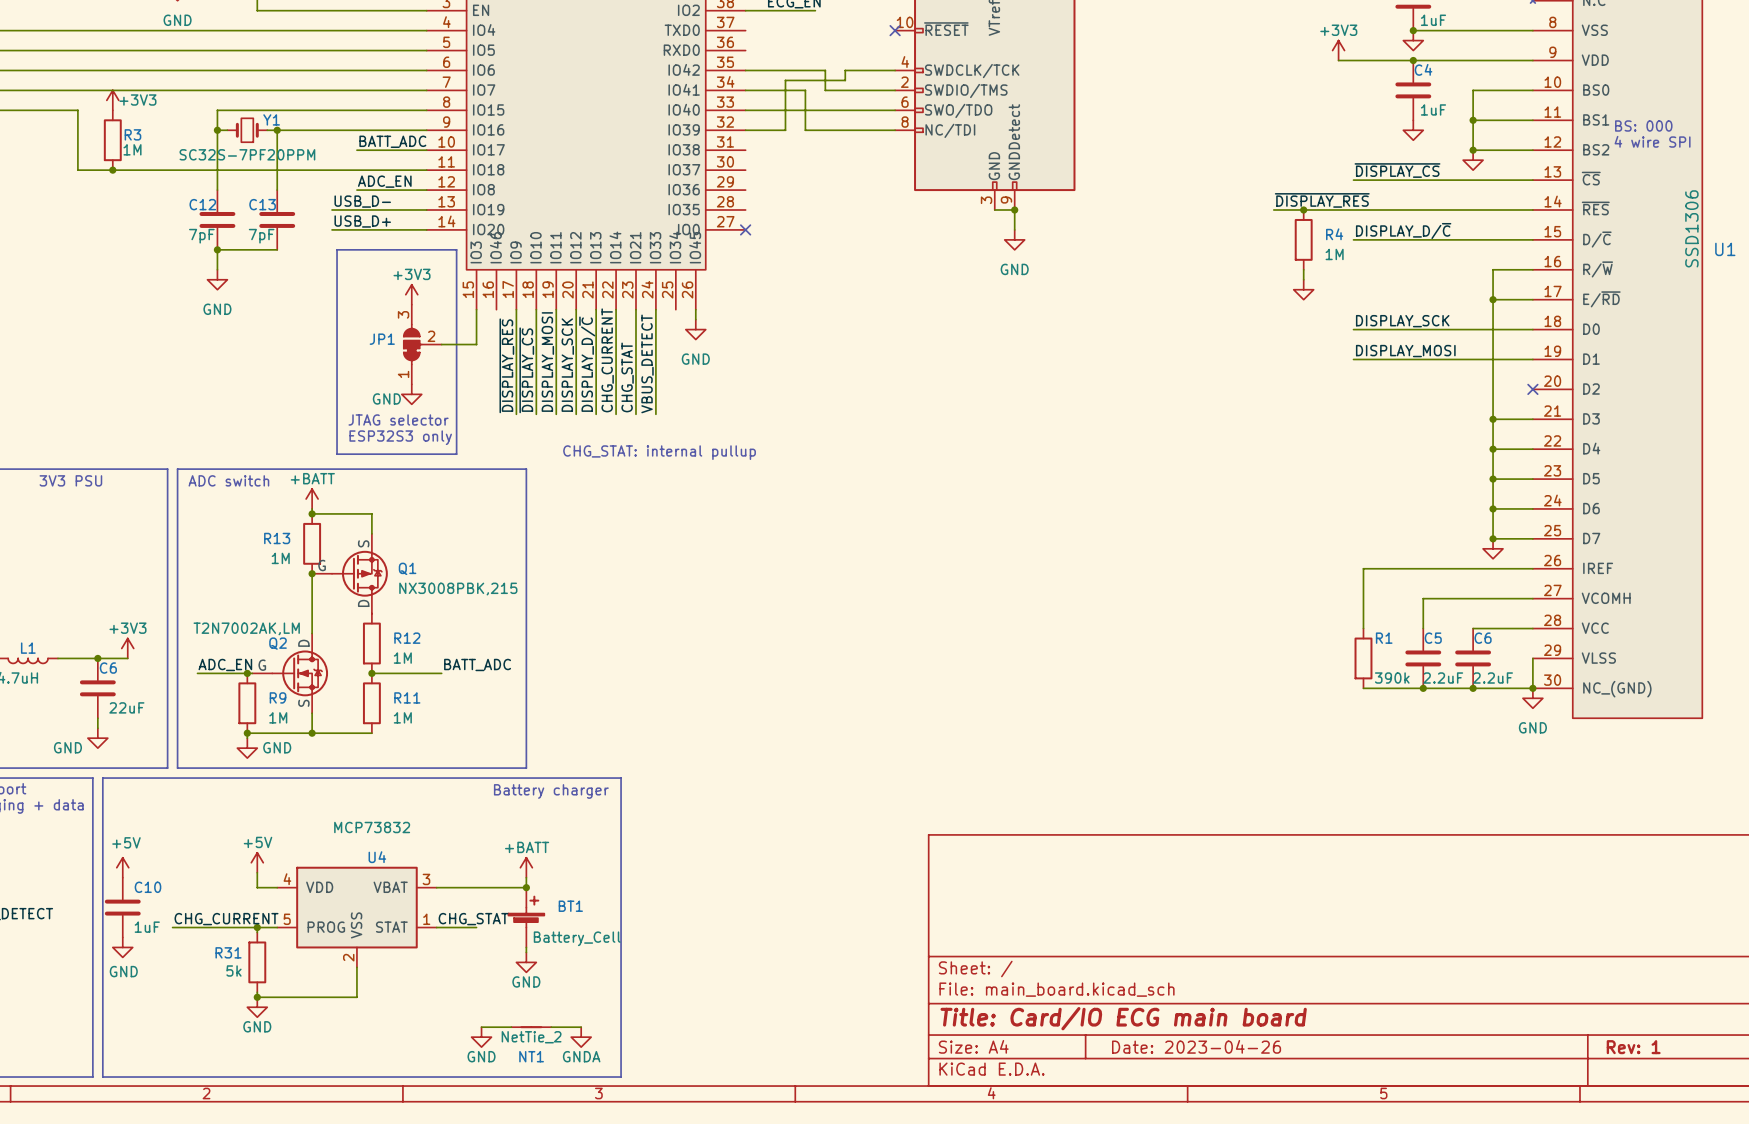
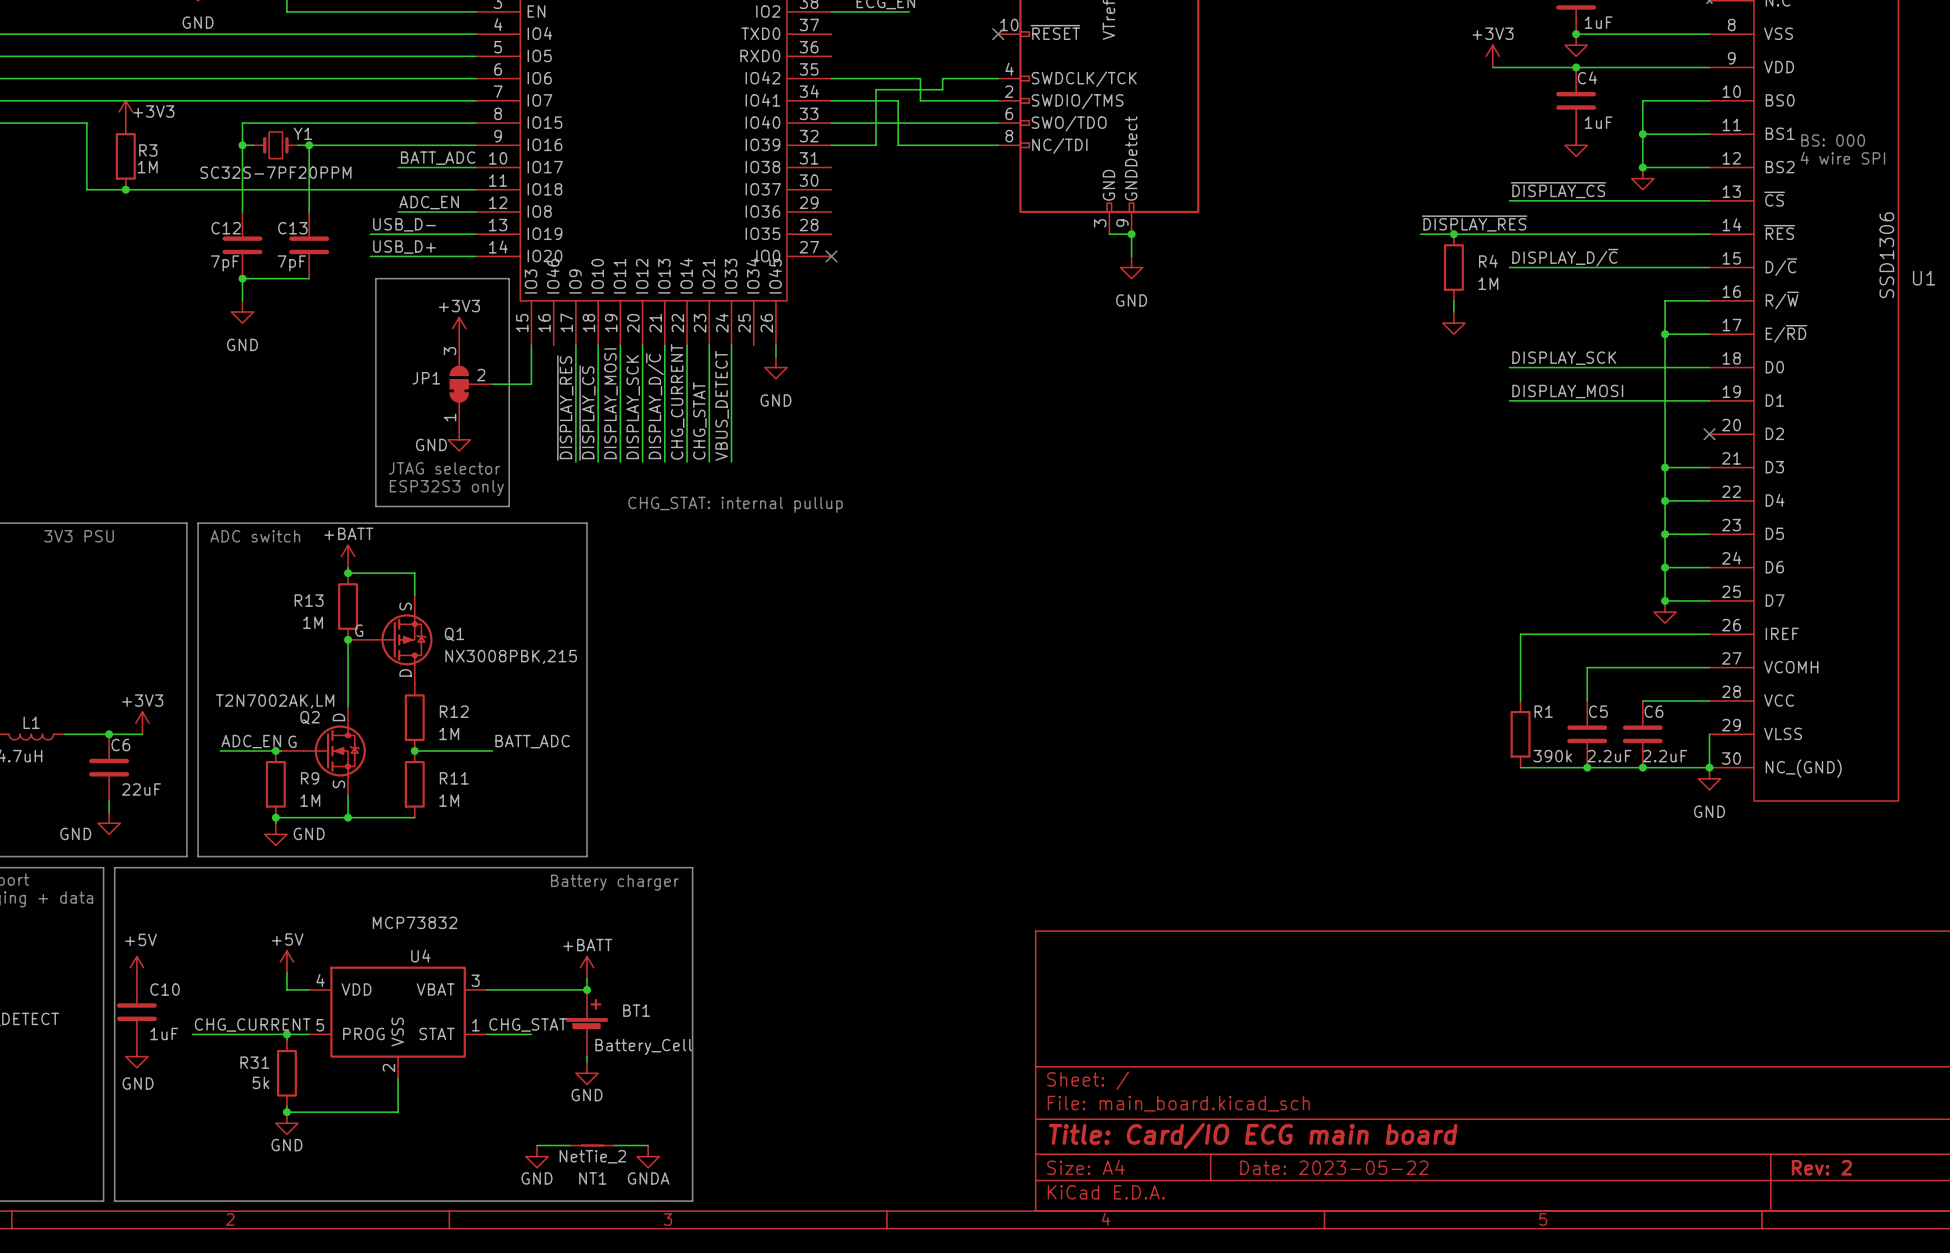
title block: Date: 2023-04-26 (1196, 1046) -> Date: 2023-05-22 (1334, 1167)
title block: Rev: 1 (1633, 1047) -> Rev: 2 (1821, 1167)

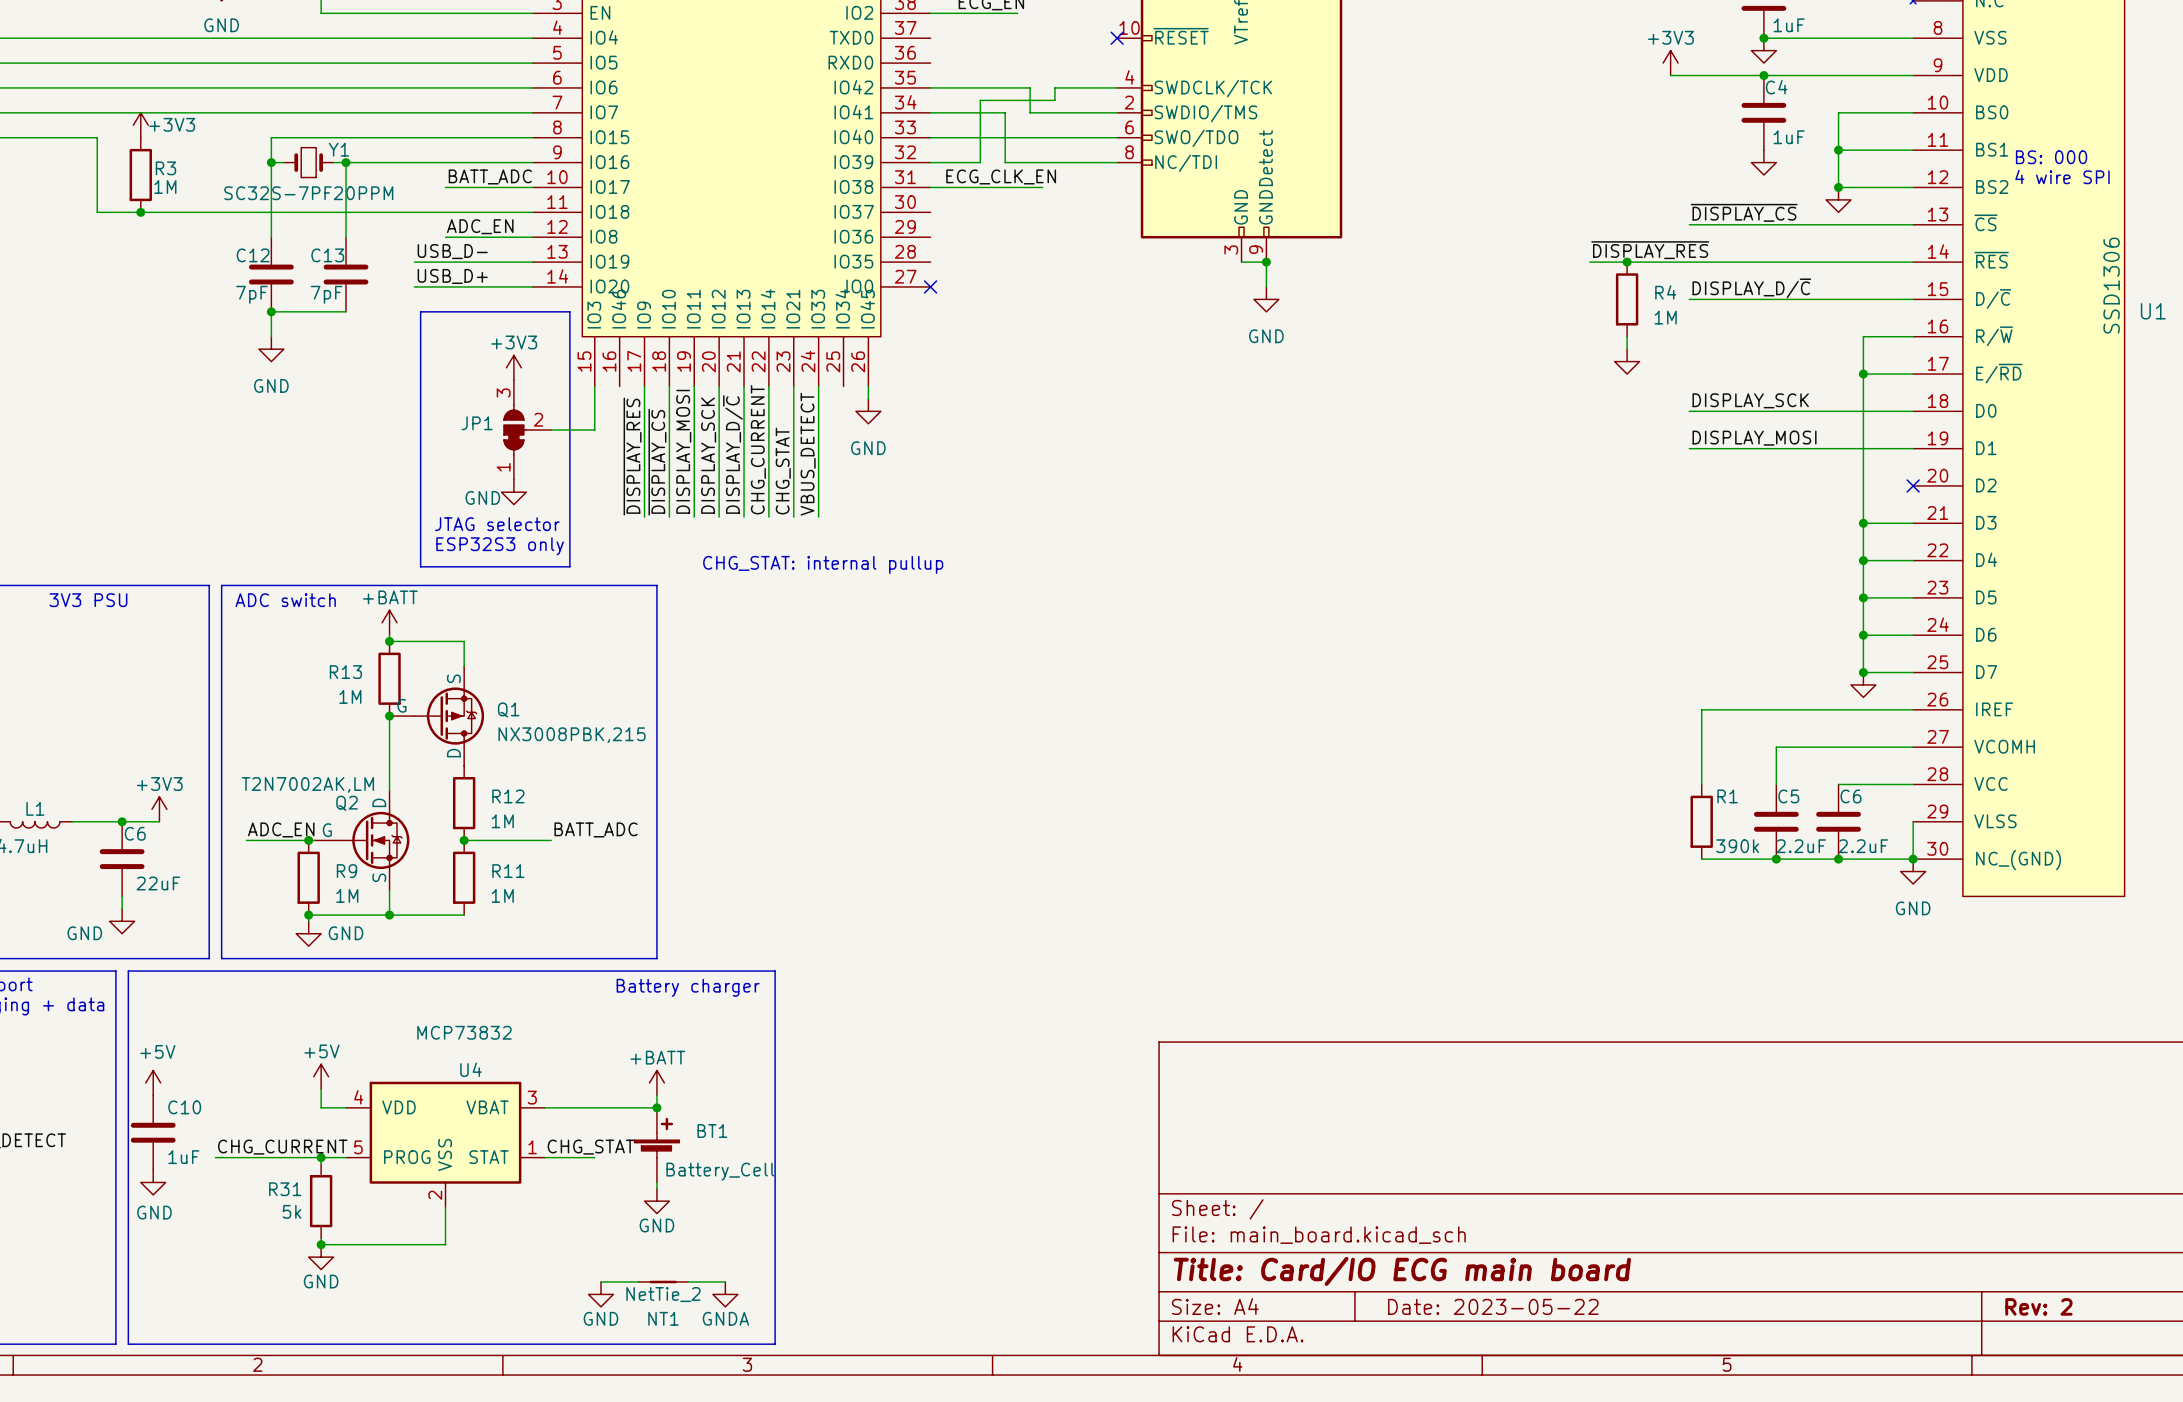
label: none -> ECG_CLK_EN (1001, 176)
wire: none -> (930, 187) (1042, 187)

